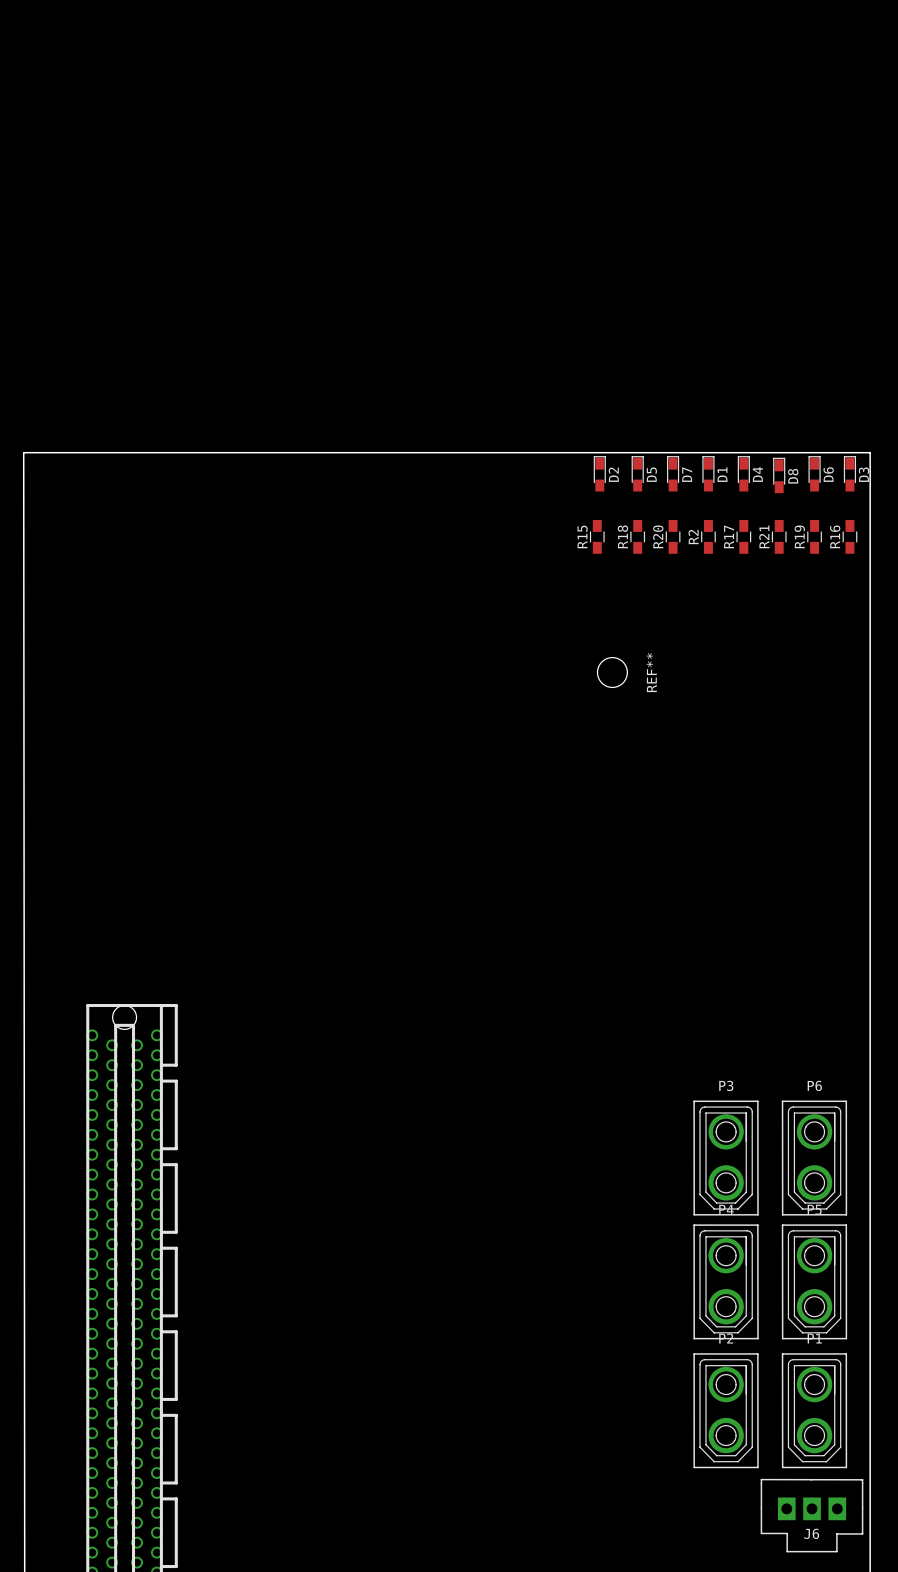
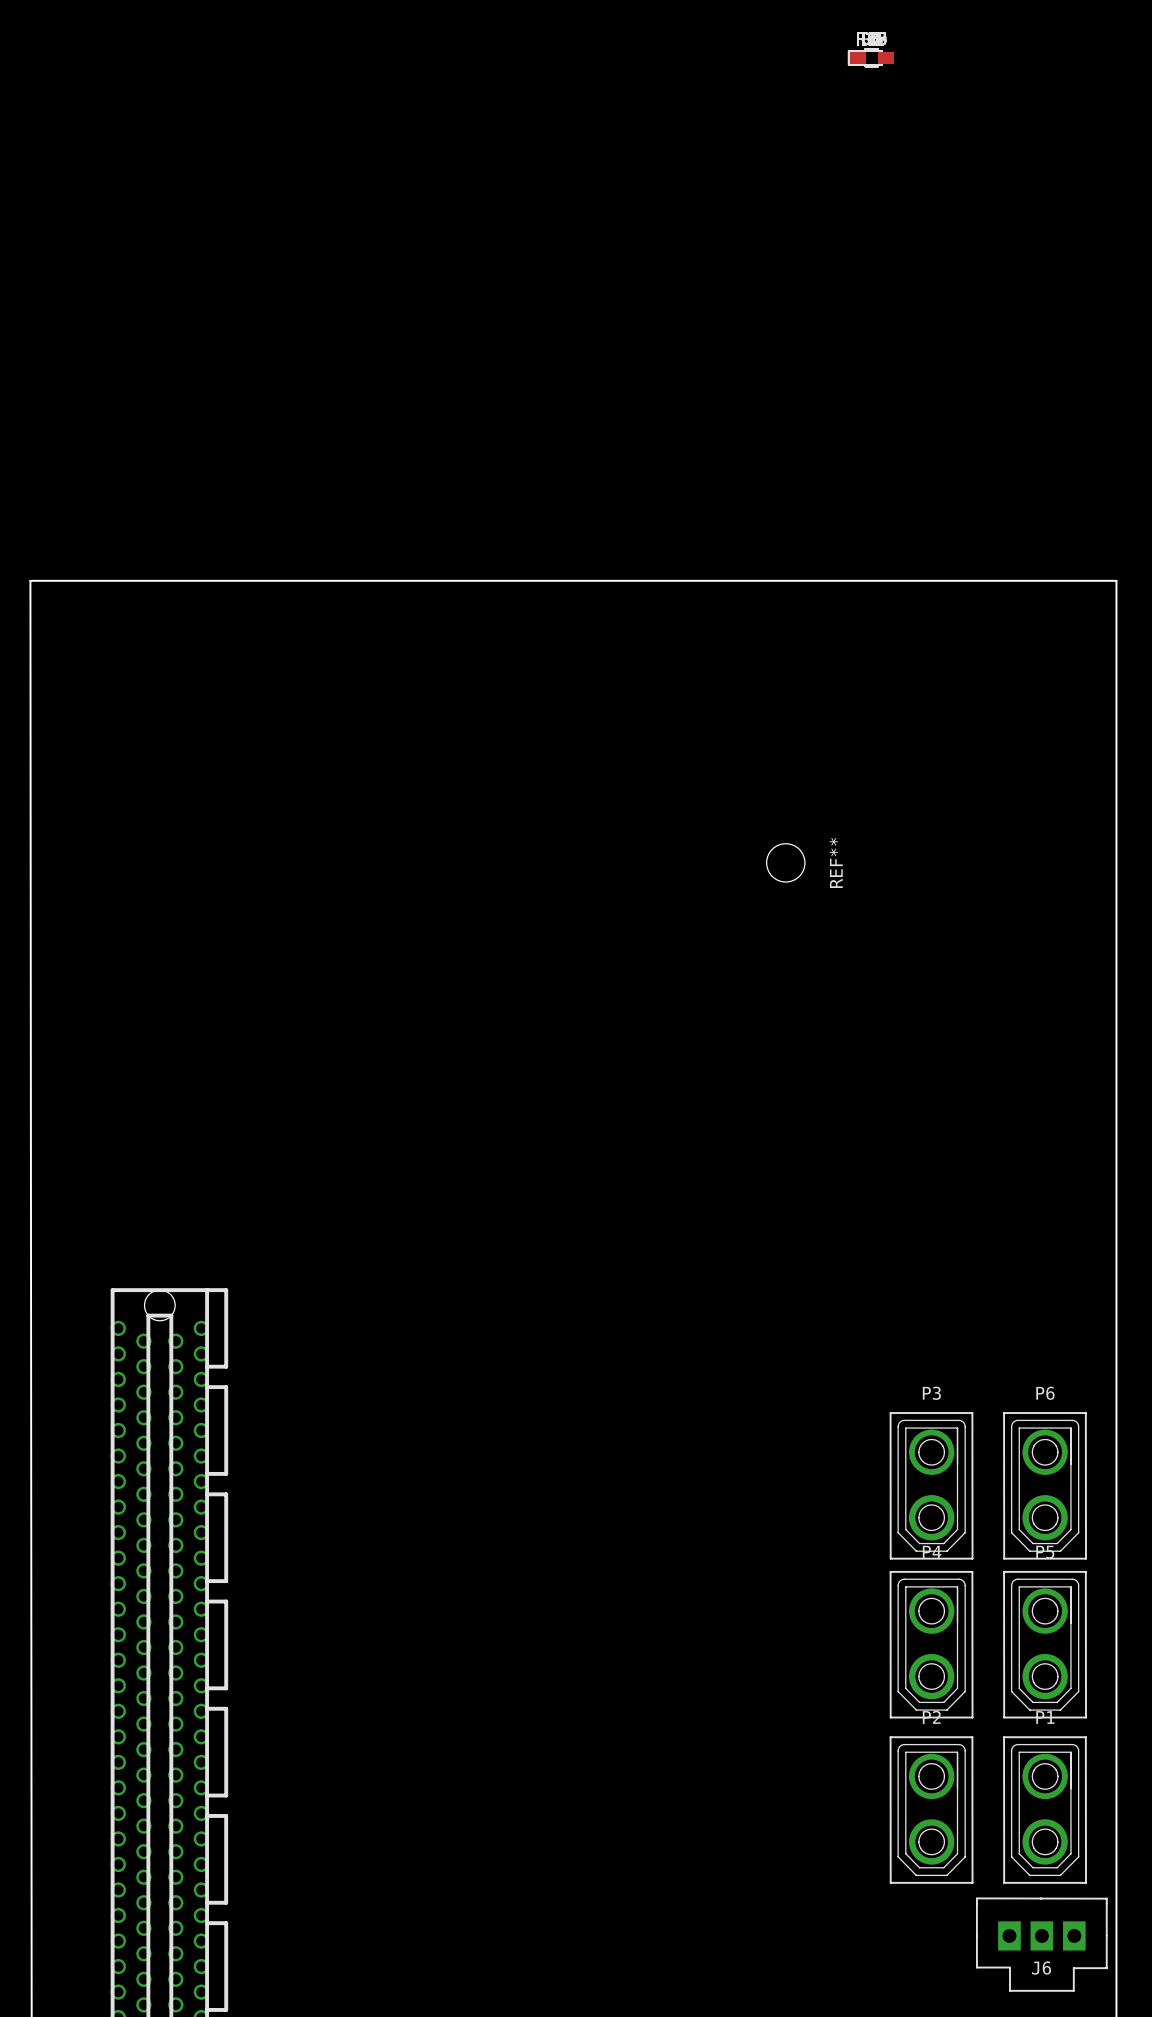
D2 rotation: 0° (599, 473) -> 90° counterclockwise (870, 57)
D2 position: (599, 473) -> (870, 57)
D5 rotation: 0° (637, 473) -> 90° counterclockwise (870, 57)
D5 position: (637, 473) -> (870, 57)
D7 rotation: 0° (673, 473) -> 90° counterclockwise (870, 57)
D7 position: (673, 473) -> (870, 57)
D1 rotation: 0° (708, 473) -> 90° counterclockwise (870, 57)
D1 position: (708, 473) -> (870, 57)
D4 rotation: 0° (743, 473) -> 90° counterclockwise (870, 57)
D4 position: (743, 473) -> (870, 57)
D6 rotation: 0° (814, 473) -> 90° counterclockwise (870, 57)
D6 position: (814, 473) -> (870, 57)
D3 rotation: 0° (849, 473) -> 90° counterclockwise (870, 57)
D3 position: (849, 473) -> (870, 57)
D8: (779, 475) -> none
R15 rotation: 0° (597, 536) -> 90° clockwise (871, 57)
R15 position: (597, 536) -> (871, 57)
R18 rotation: 0° (637, 536) -> 90° clockwise (871, 57)
R18 position: (637, 536) -> (871, 57)
R20 rotation: 0° (673, 536) -> 90° clockwise (871, 57)
R20 position: (673, 536) -> (871, 57)
R2 rotation: 0° (708, 536) -> 90° clockwise (871, 57)
R2 position: (708, 536) -> (871, 57)
R17 rotation: 0° (743, 536) -> 90° clockwise (871, 57)
R17 position: (743, 536) -> (871, 57)
R21: (779, 536) -> none
R19 rotation: 0° (814, 536) -> 90° clockwise (871, 57)
R19 position: (814, 536) -> (871, 57)
R16 rotation: 0° (849, 536) -> 90° clockwise (871, 57)
R16 position: (849, 536) -> (871, 57)

